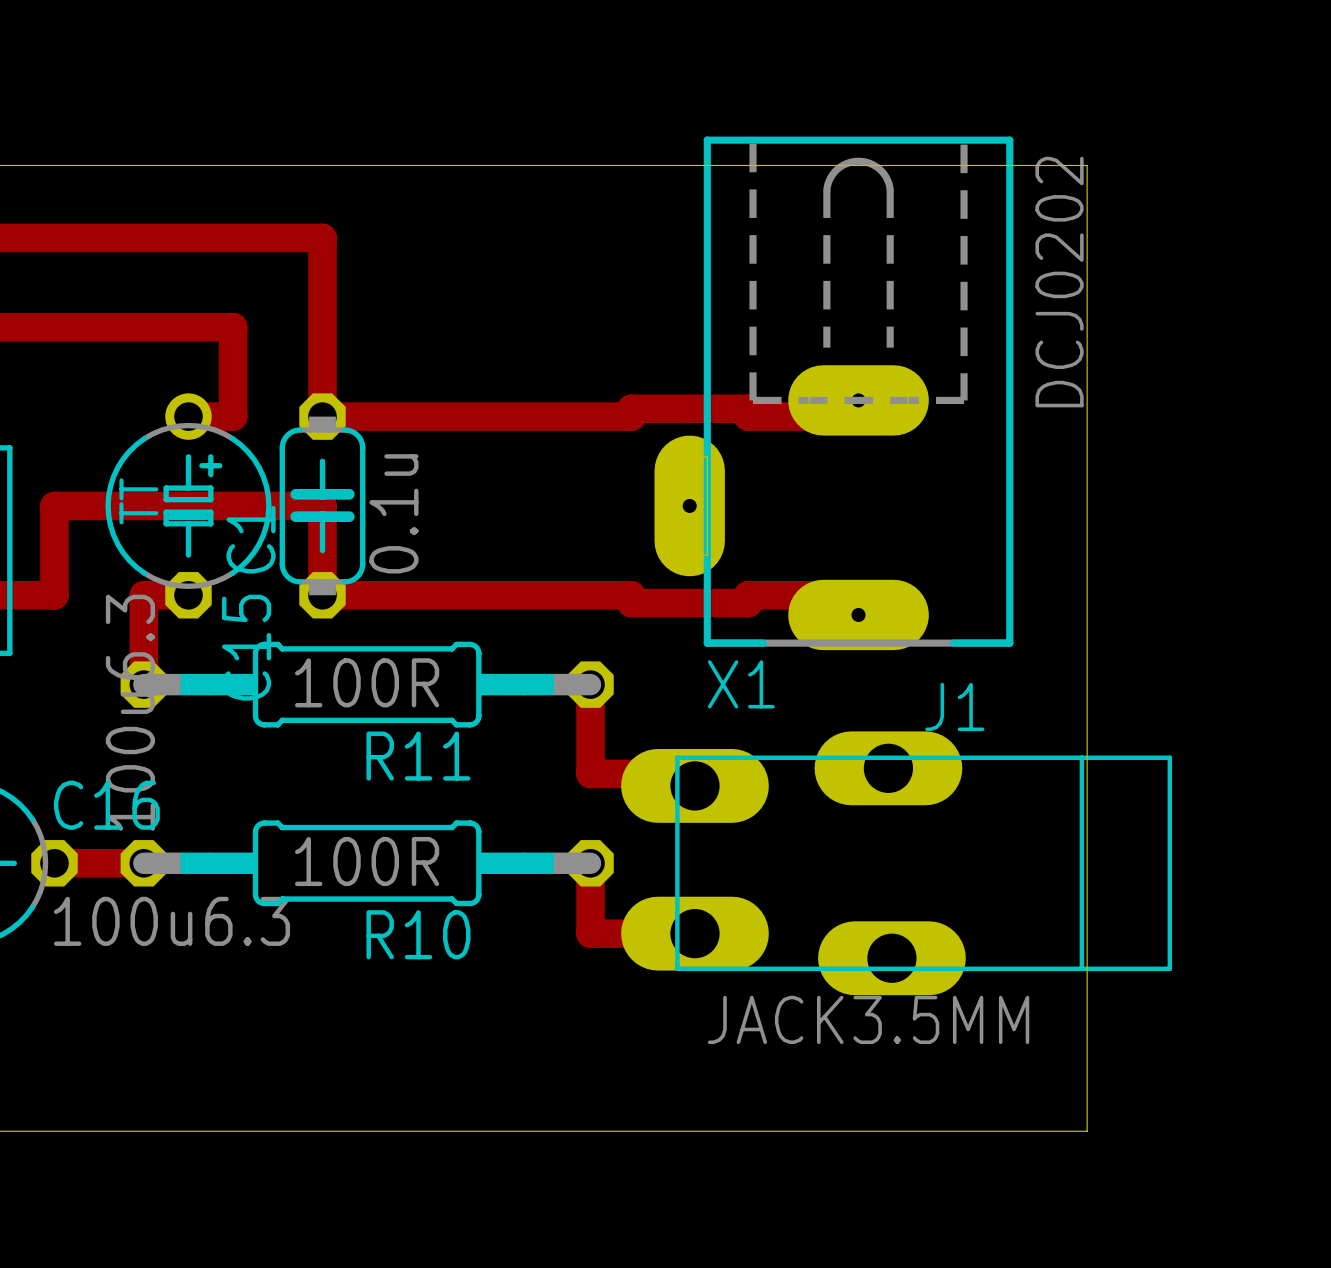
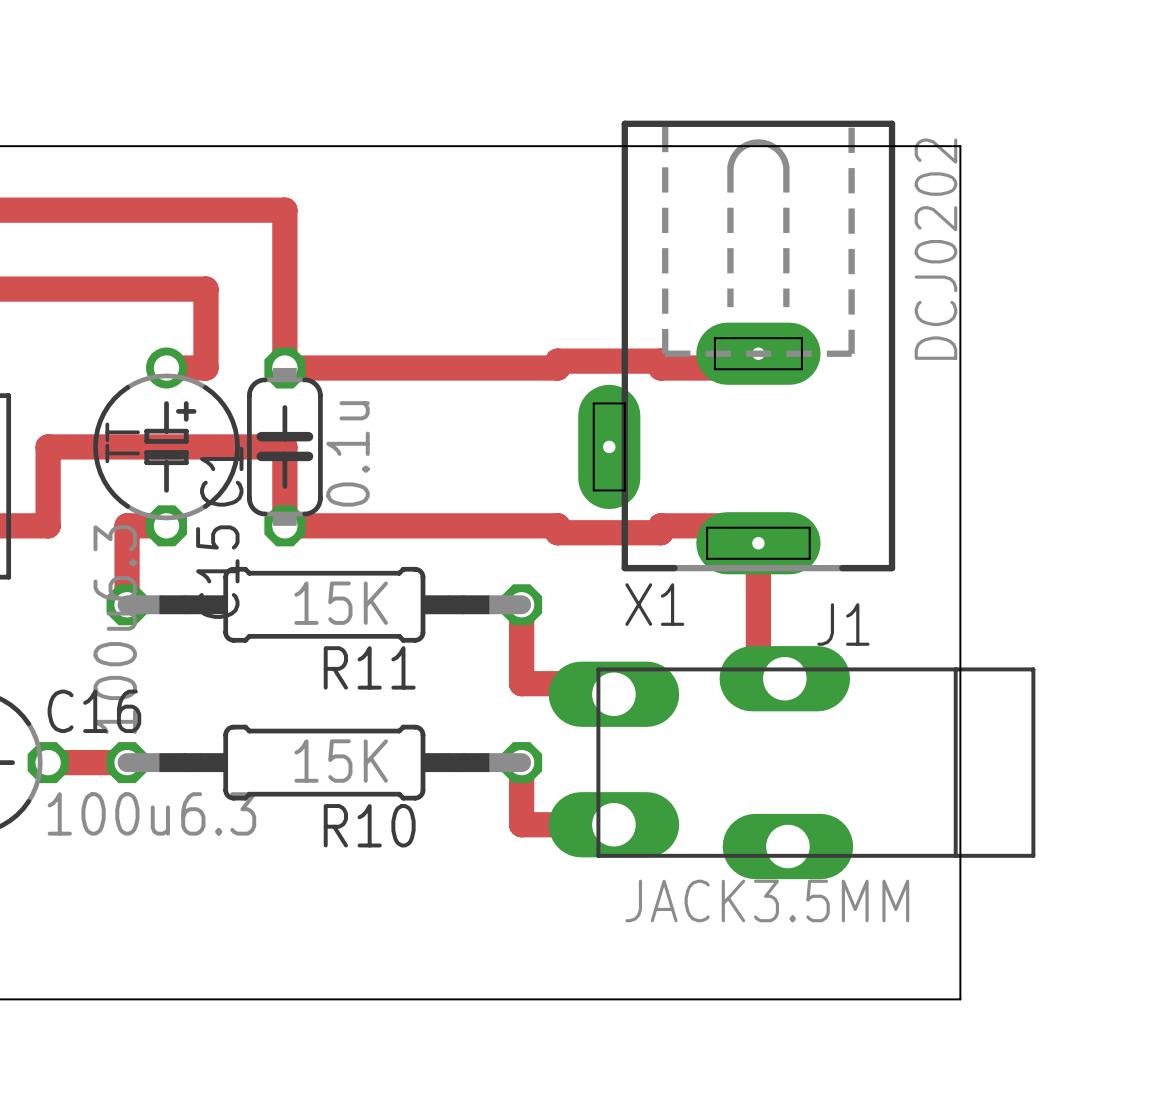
top track: none -> (758, 525) (758, 678)
R11 value: 100R (367, 682) -> 15K (341, 603)
R10 value: 100R (367, 861) -> 15K (341, 761)

